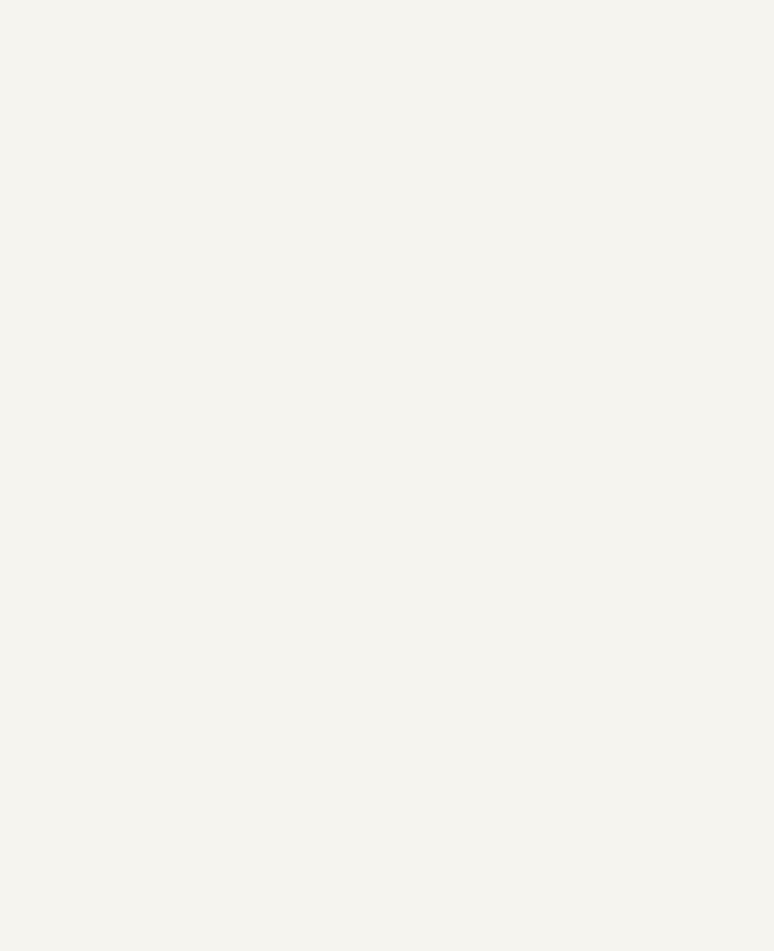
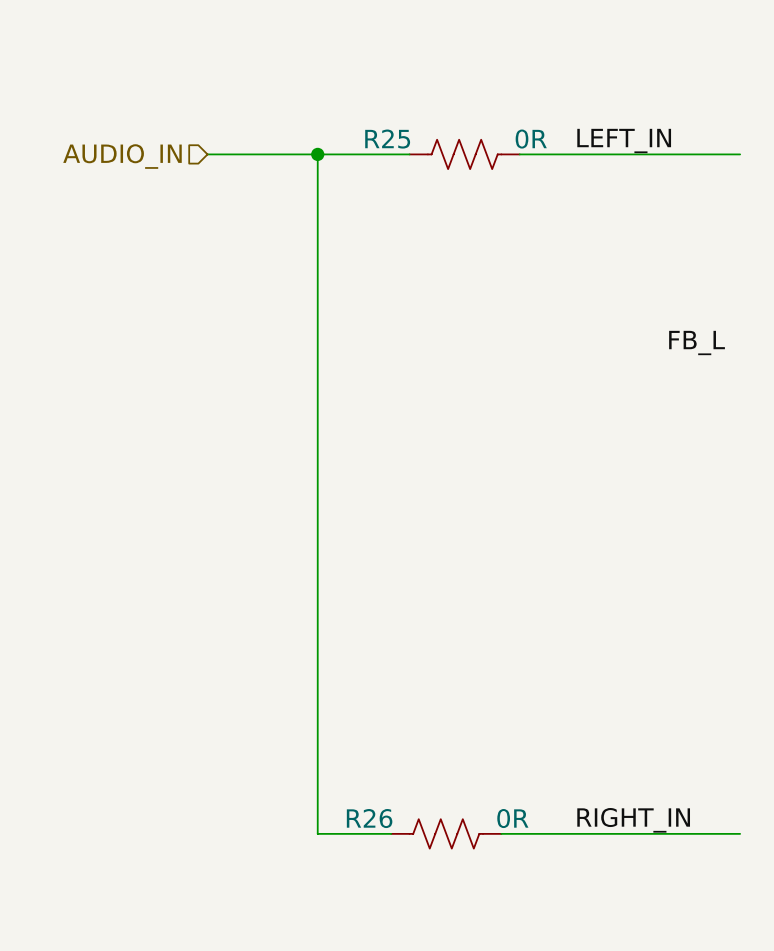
label: none -> LEFT_IN (624, 140)
hierarchical label: none -> AUDIO_IN (122, 156)
wire: none -> (207, 154) (409, 154)
wire: none -> (317, 154) (317, 833) (391, 833)
junction: none -> (317, 154)
R25: none -> 0R (464, 154)
wire: none -> (519, 154) (740, 154)
label: none -> FB_L (697, 343)
label: none -> RIGHT_IN (633, 820)
R26: none -> 0R (446, 833)
wire: none -> (501, 833) (740, 833)

